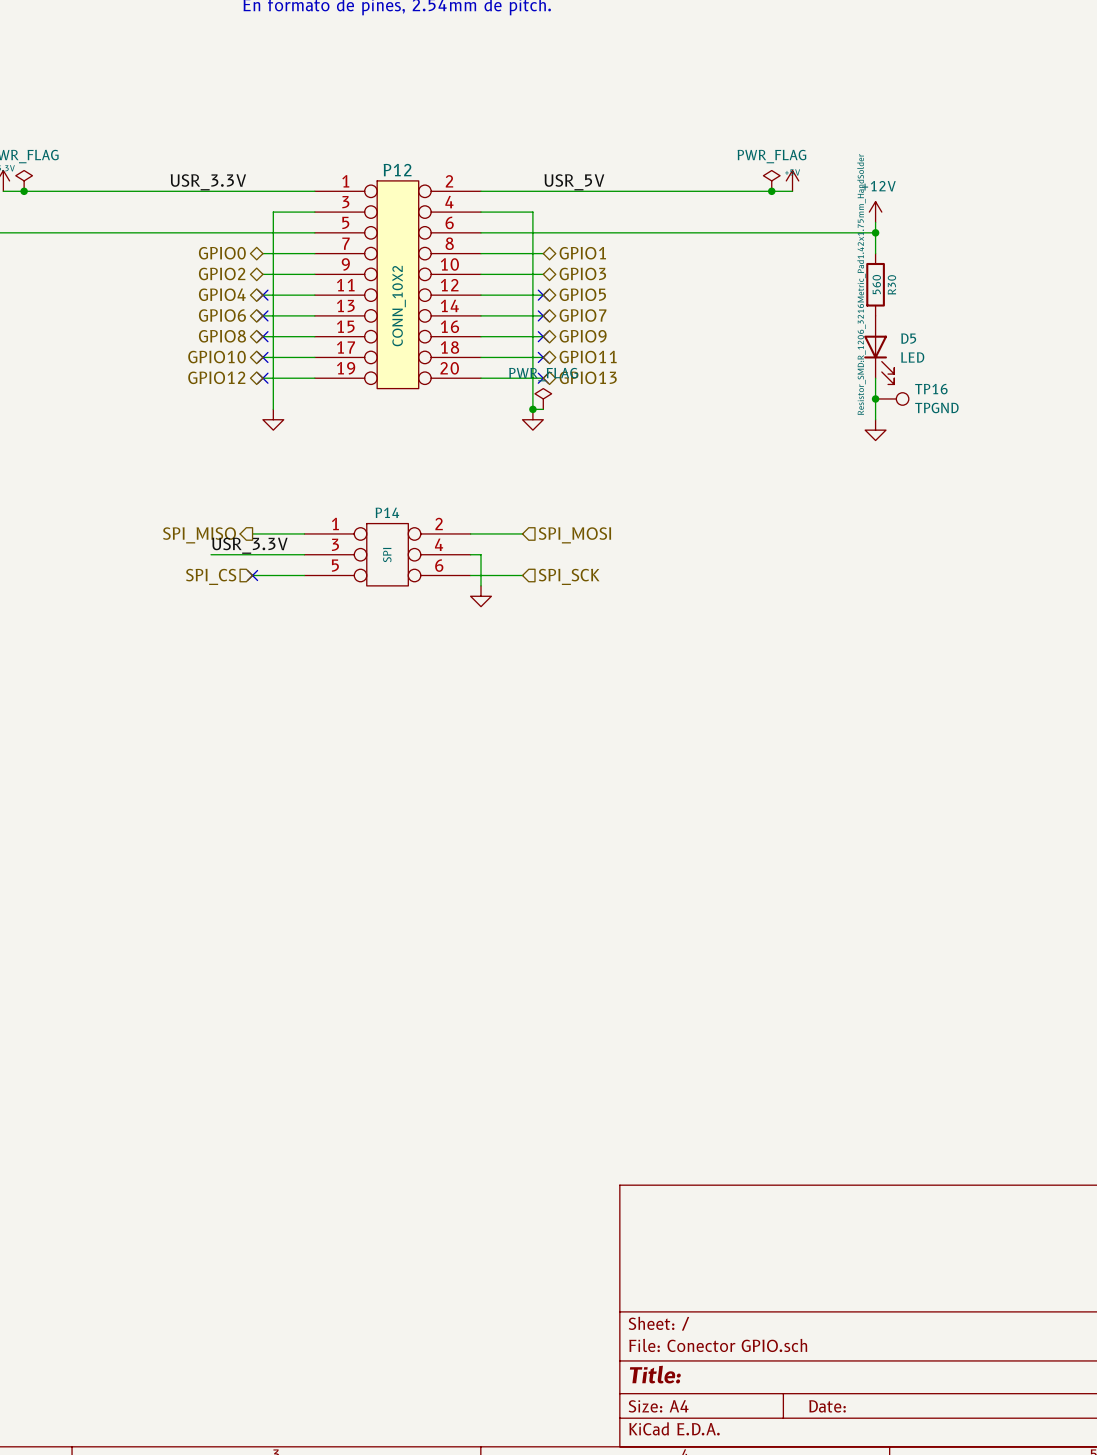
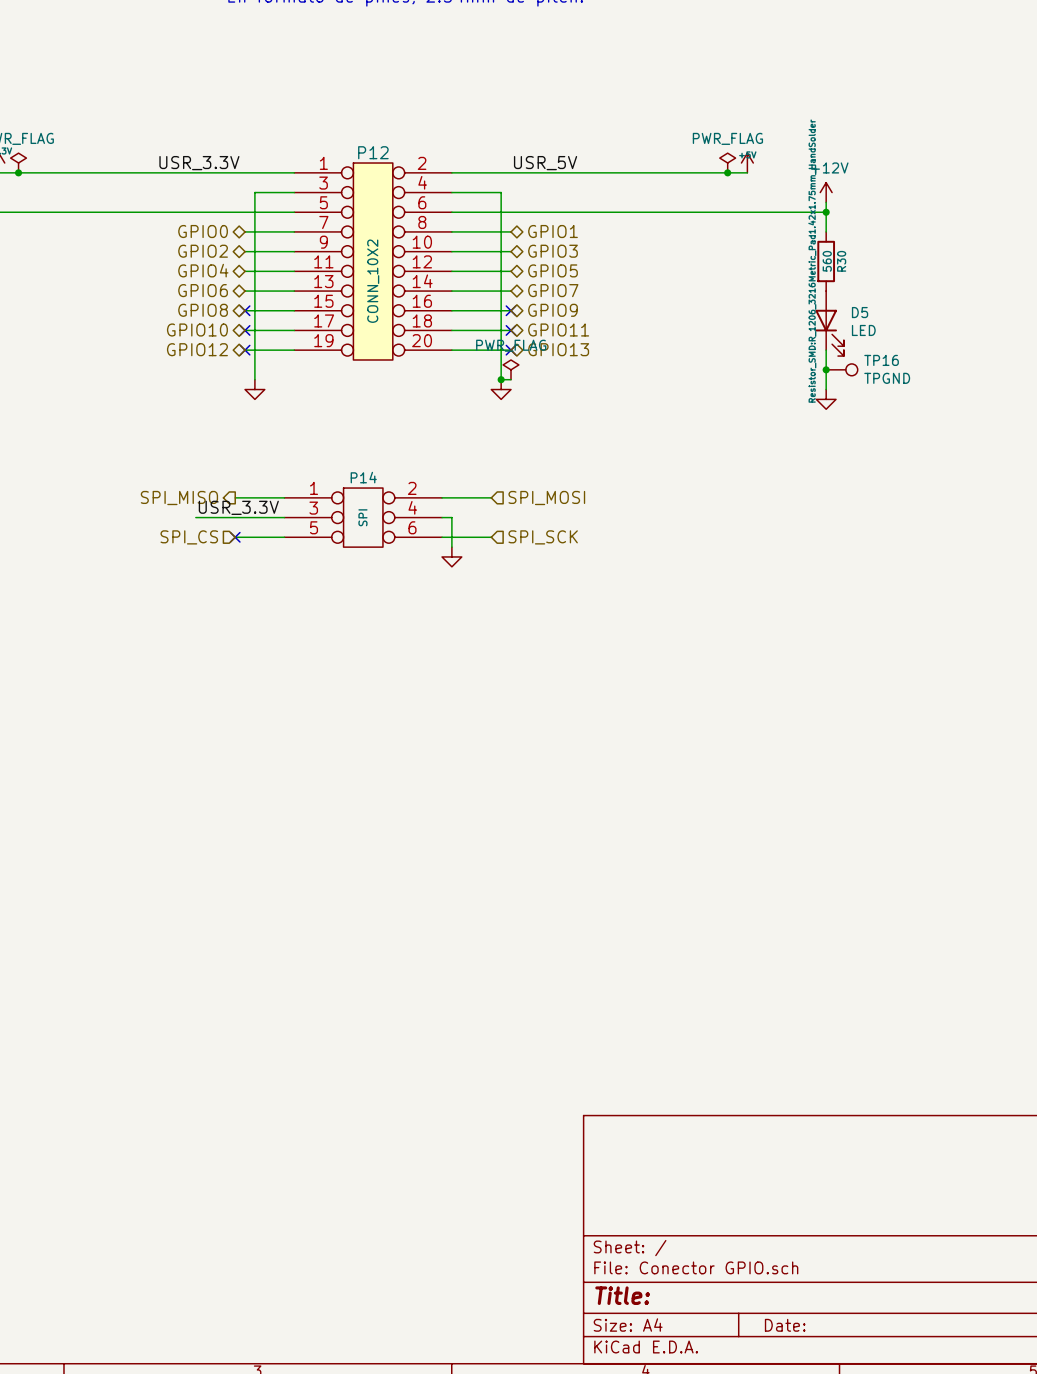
no-connect mark: (262, 295) -> none
no-connect mark: (543, 295) -> none
no-connect mark: (262, 315) -> none
no-connect mark: (543, 315) -> none

